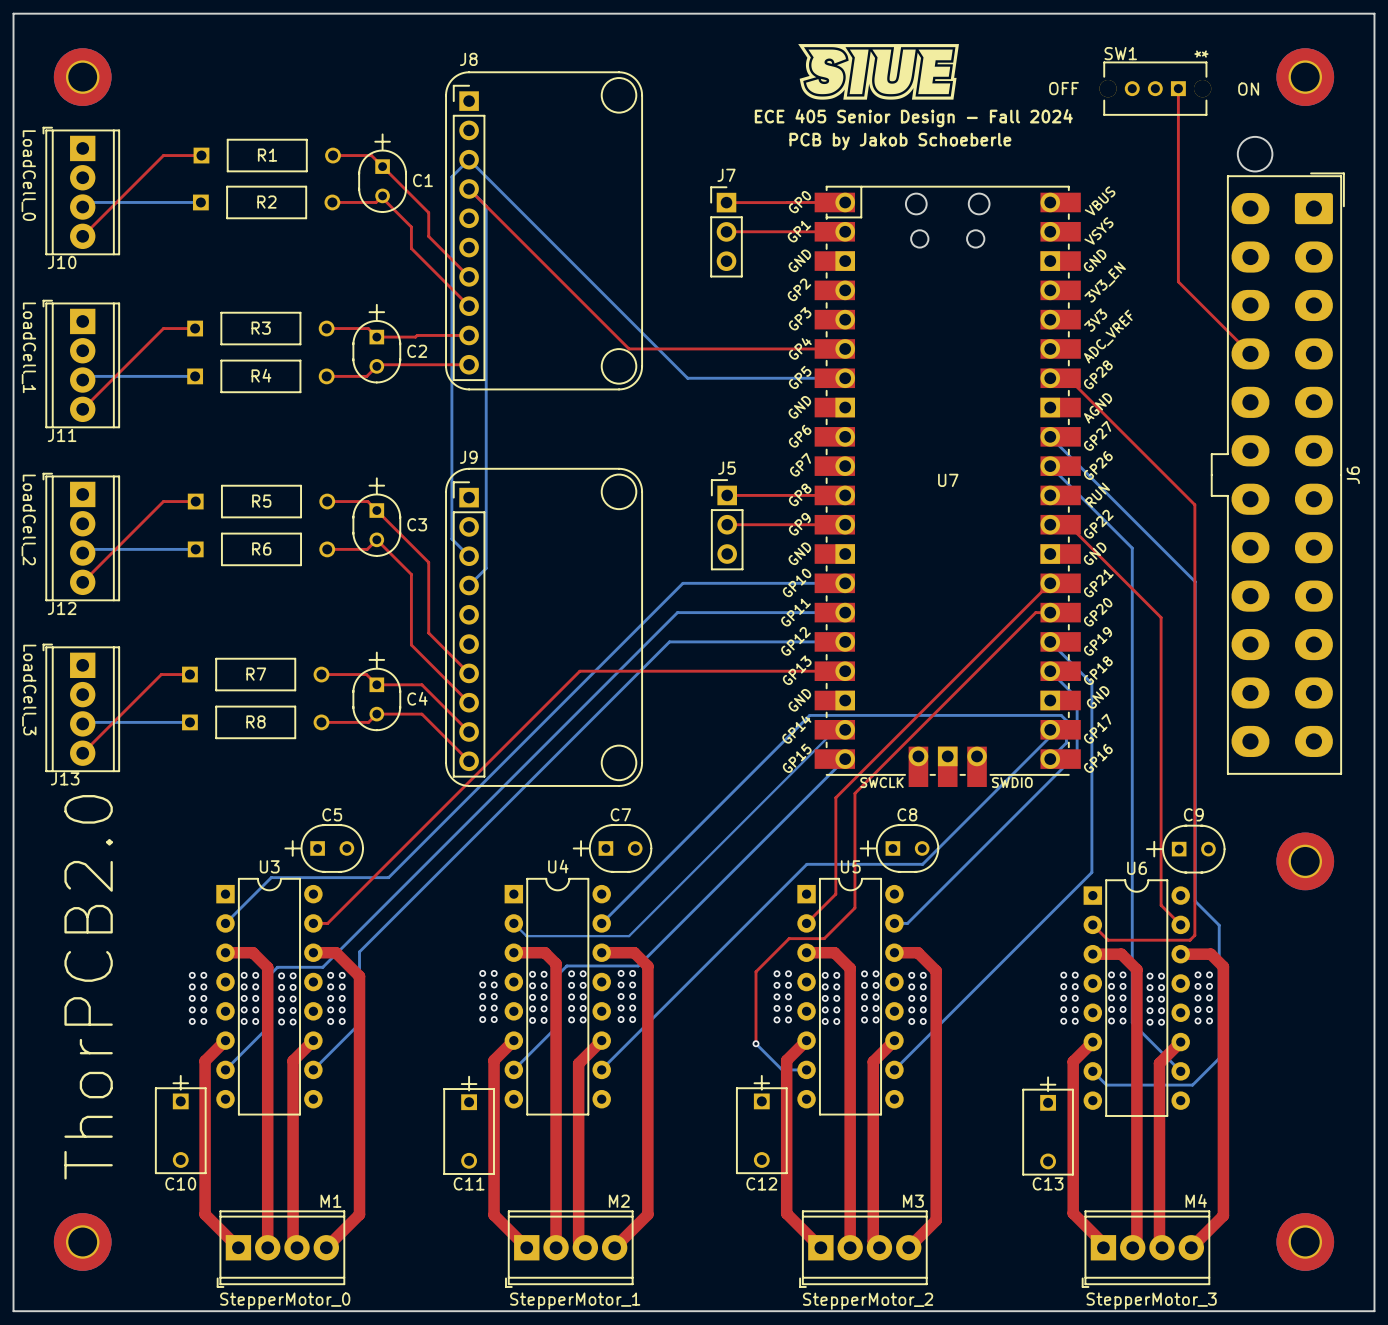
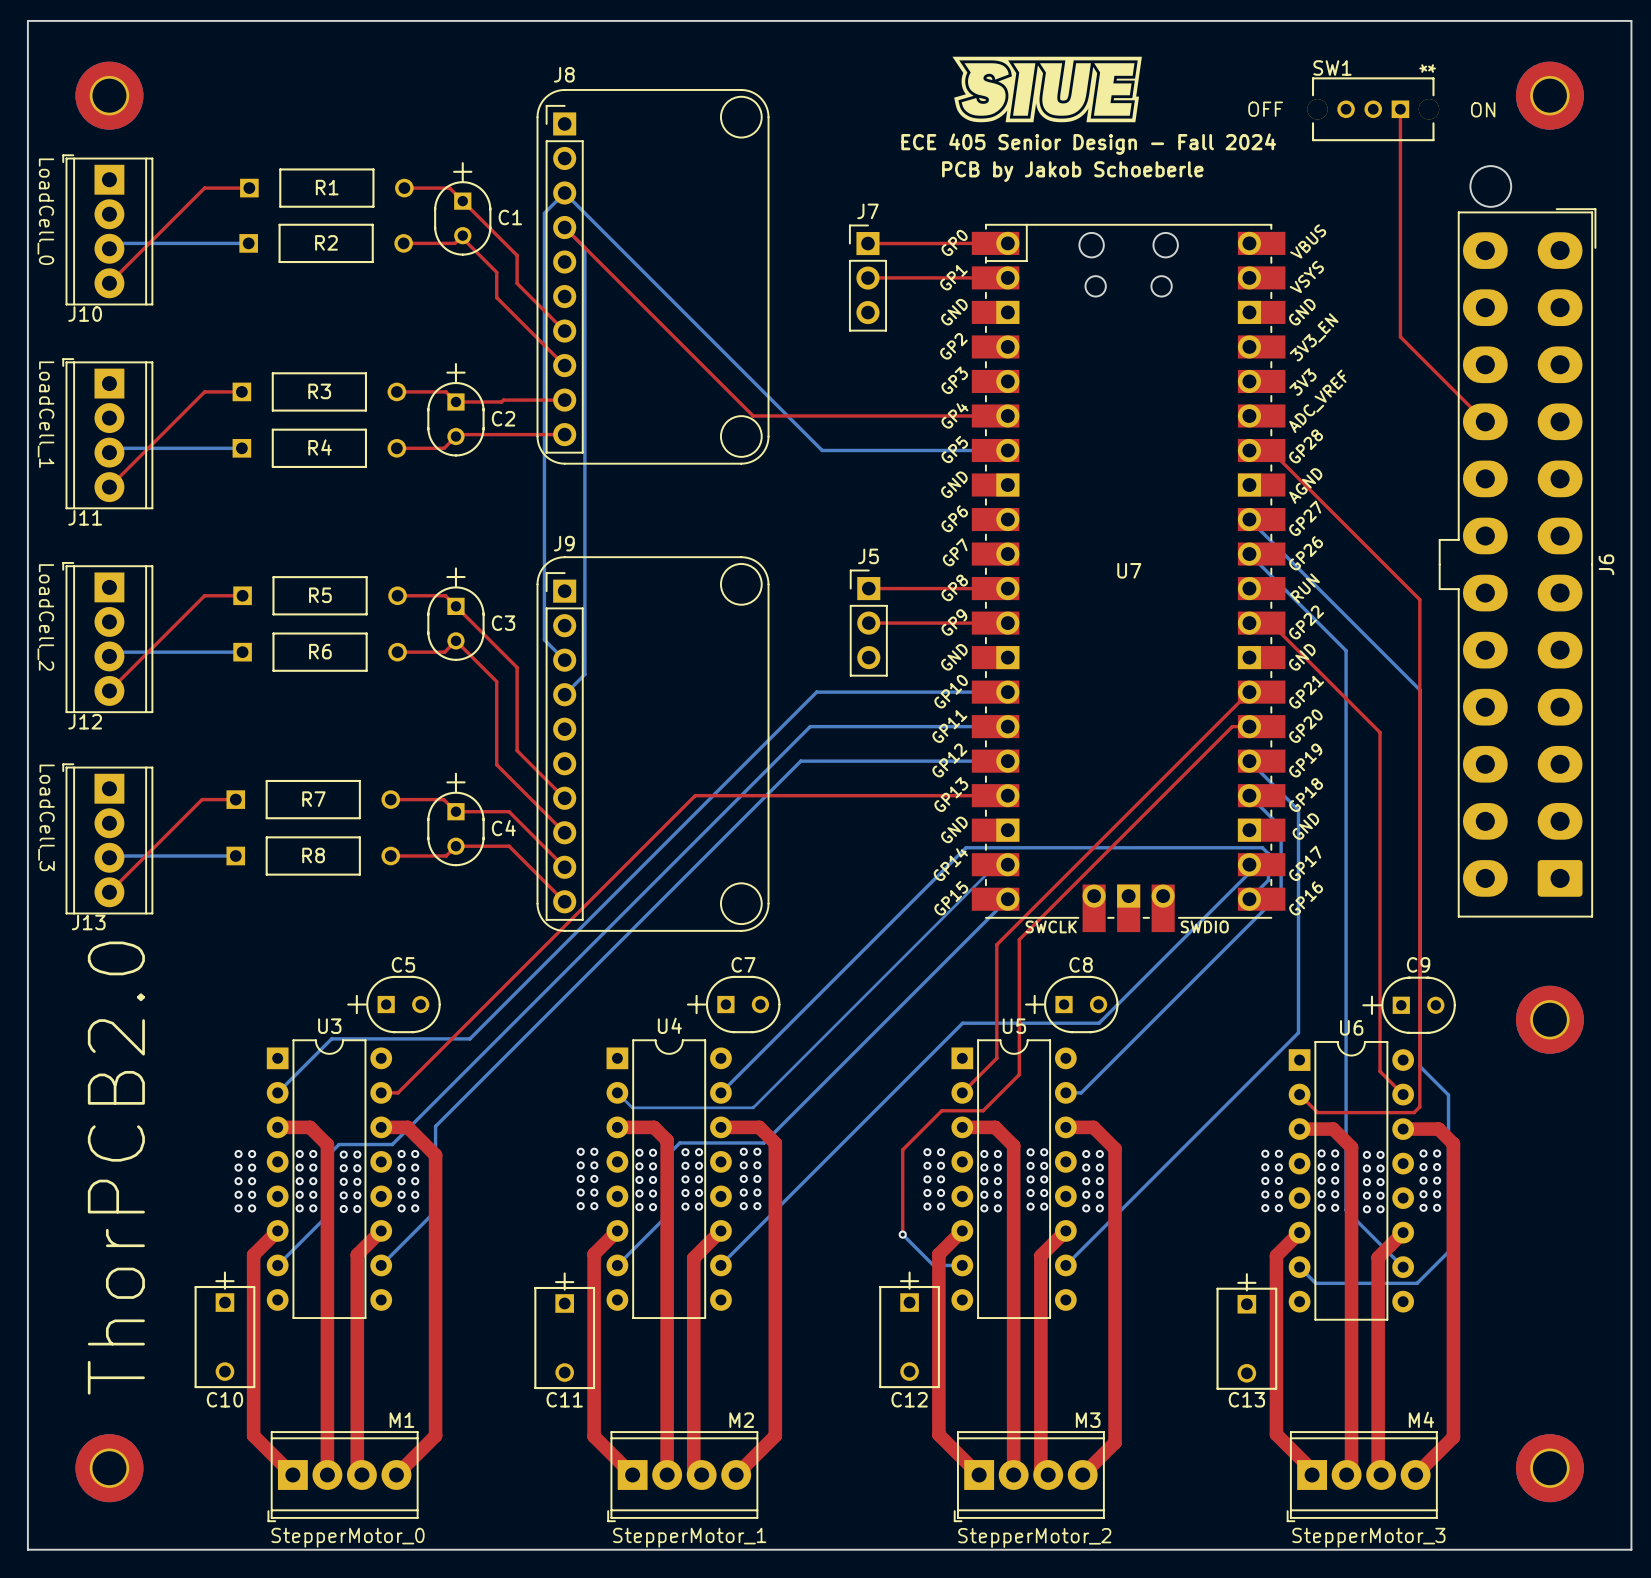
J6 footprint: [1211, 136, 1345, 775] -> [1438, 166, 1597, 918]

